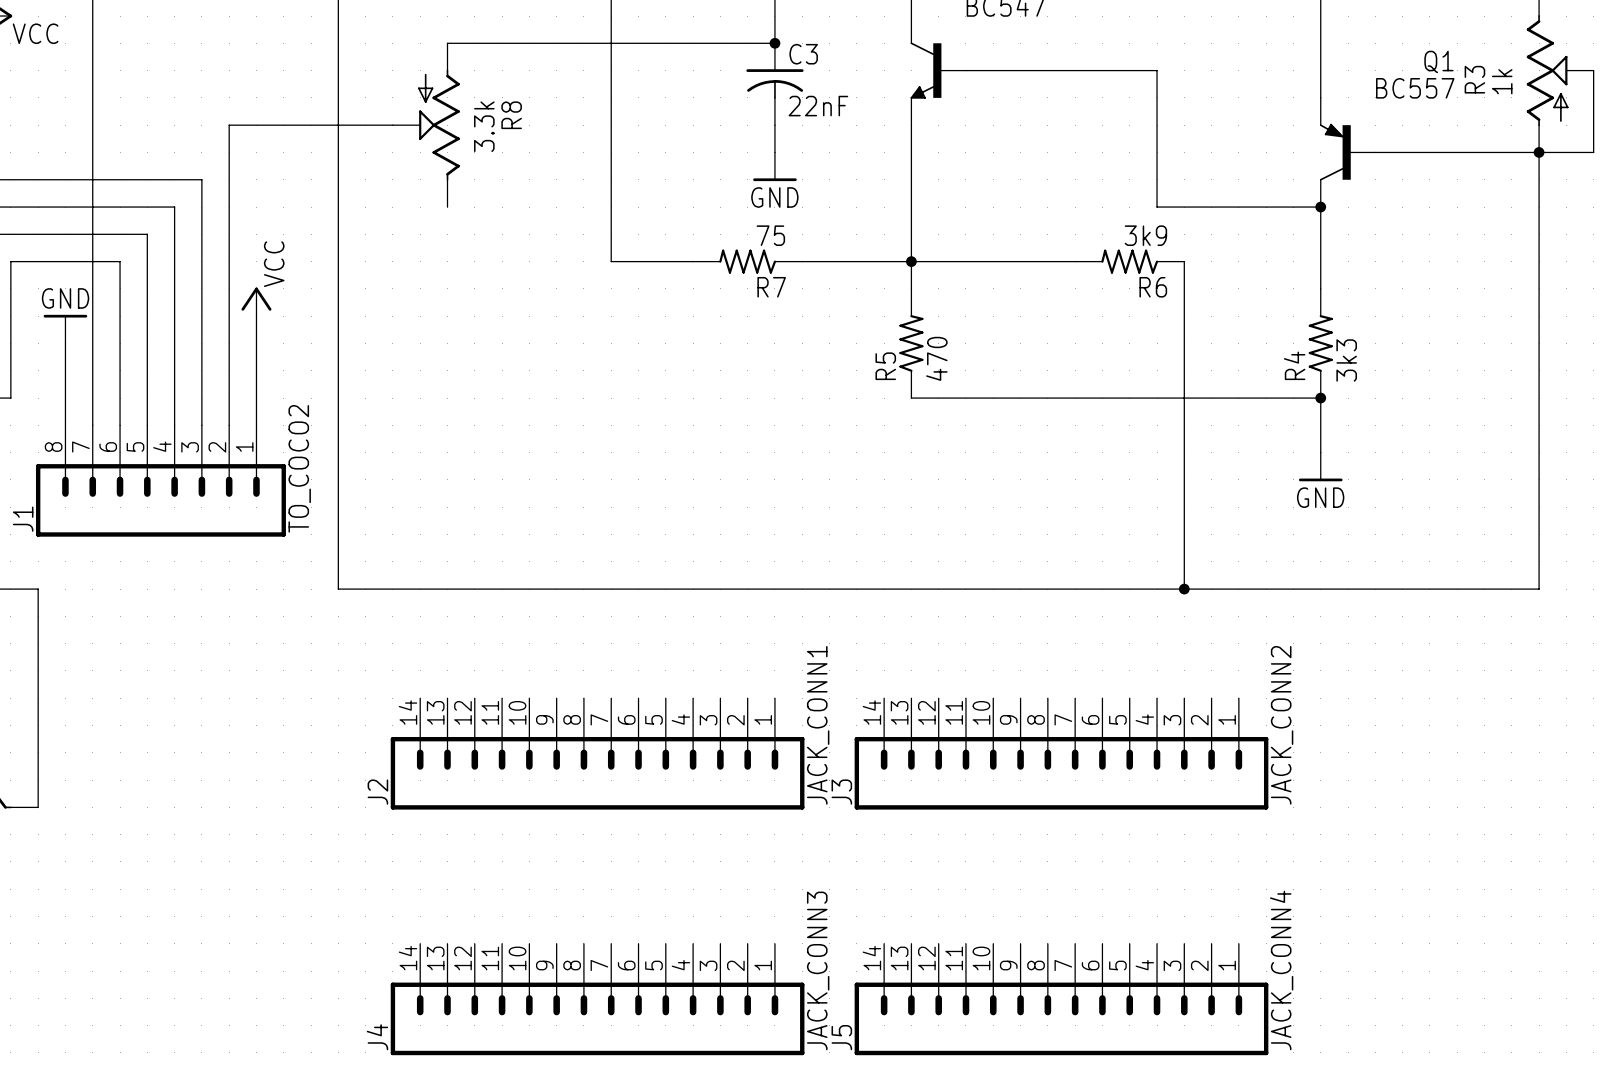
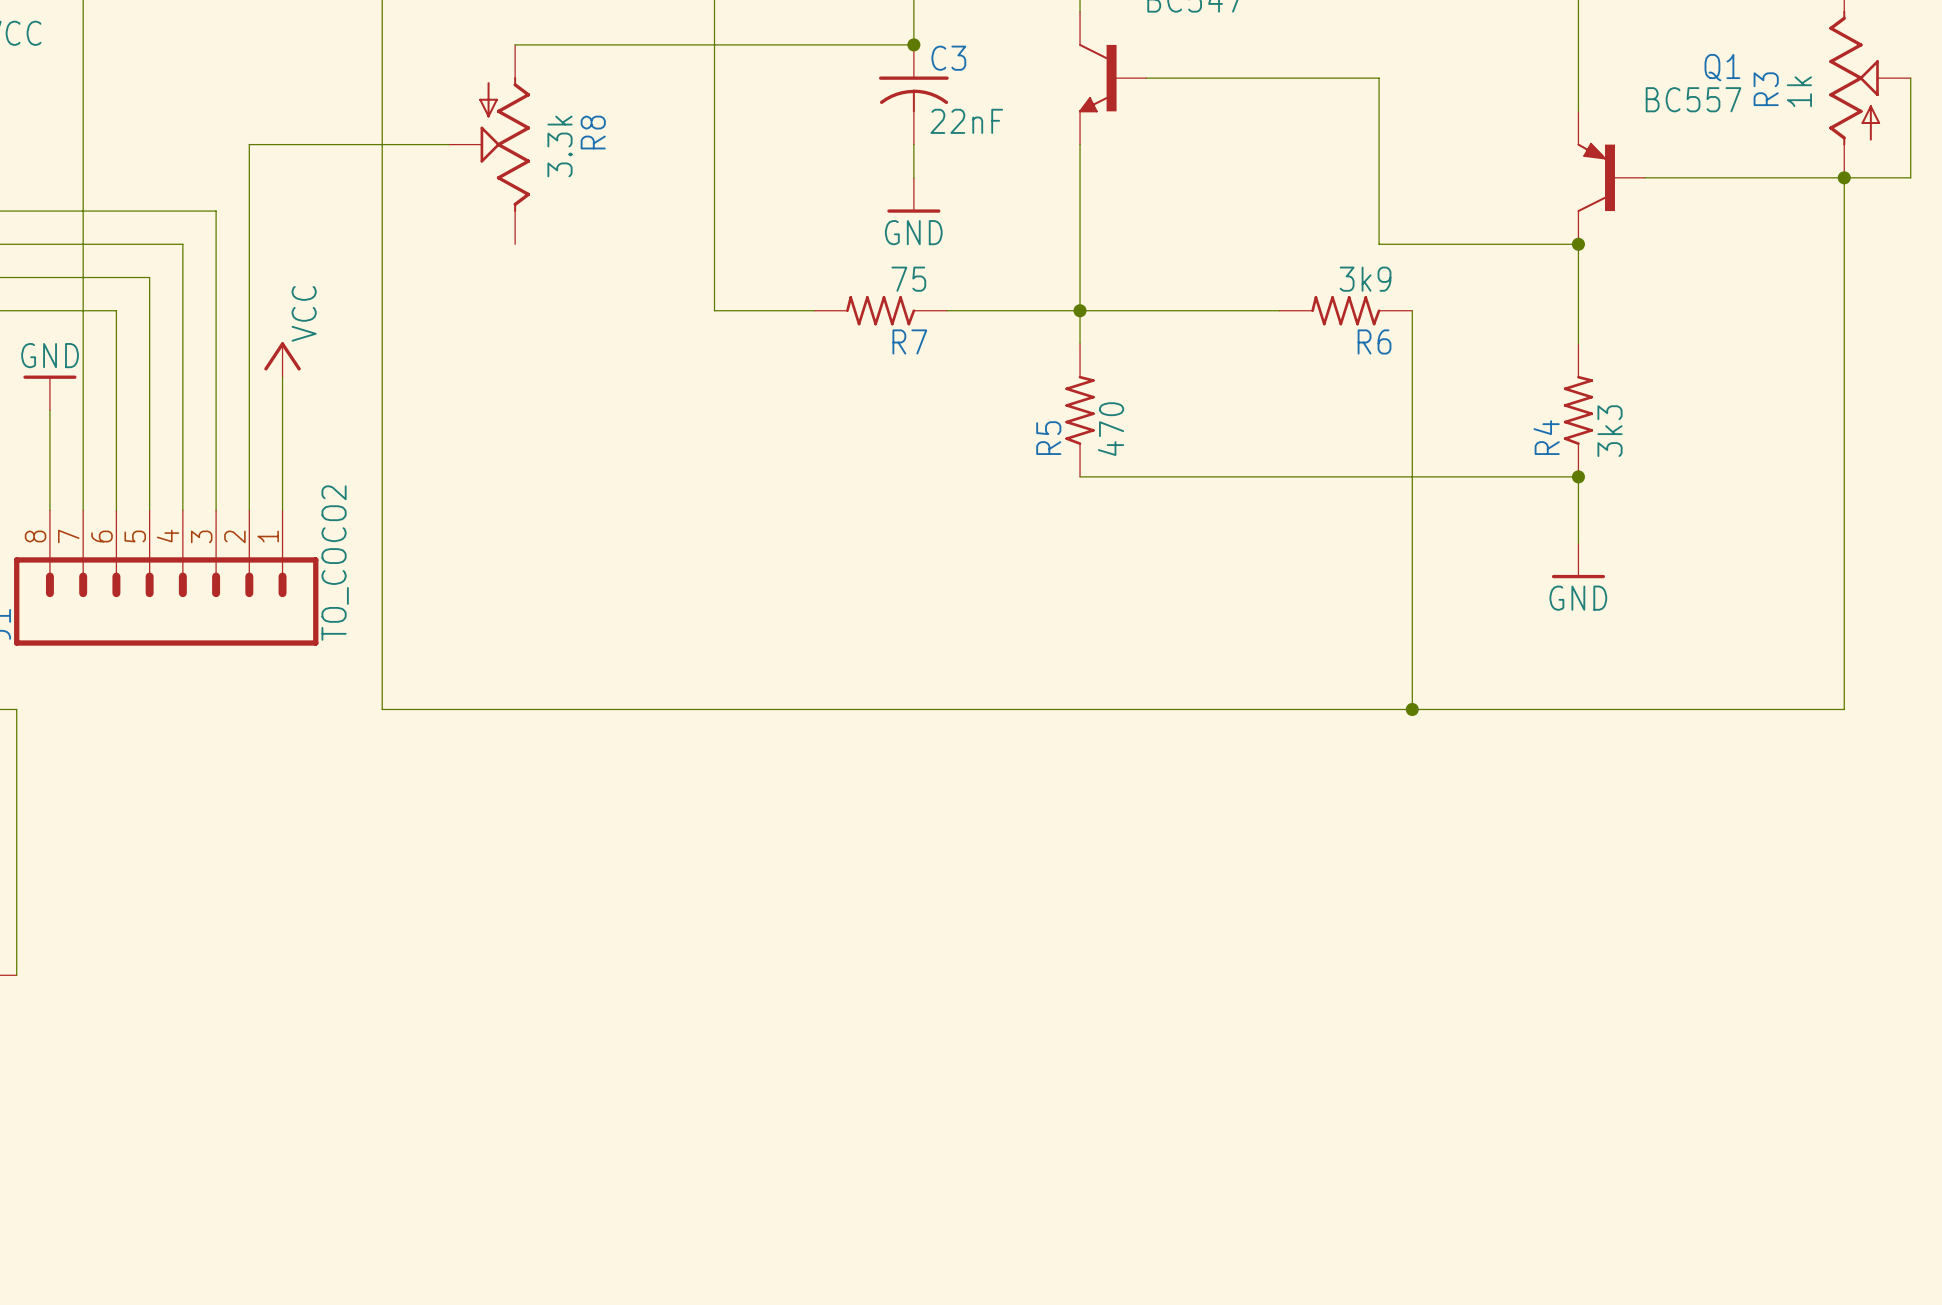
J2: JACK_CONN1 (597, 753) -> none
J3: JACK_CONN2 (1061, 753) -> none
J4: JACK_CONN3 (597, 999) -> none
J5: JACK_CONN4 (1061, 999) -> none

